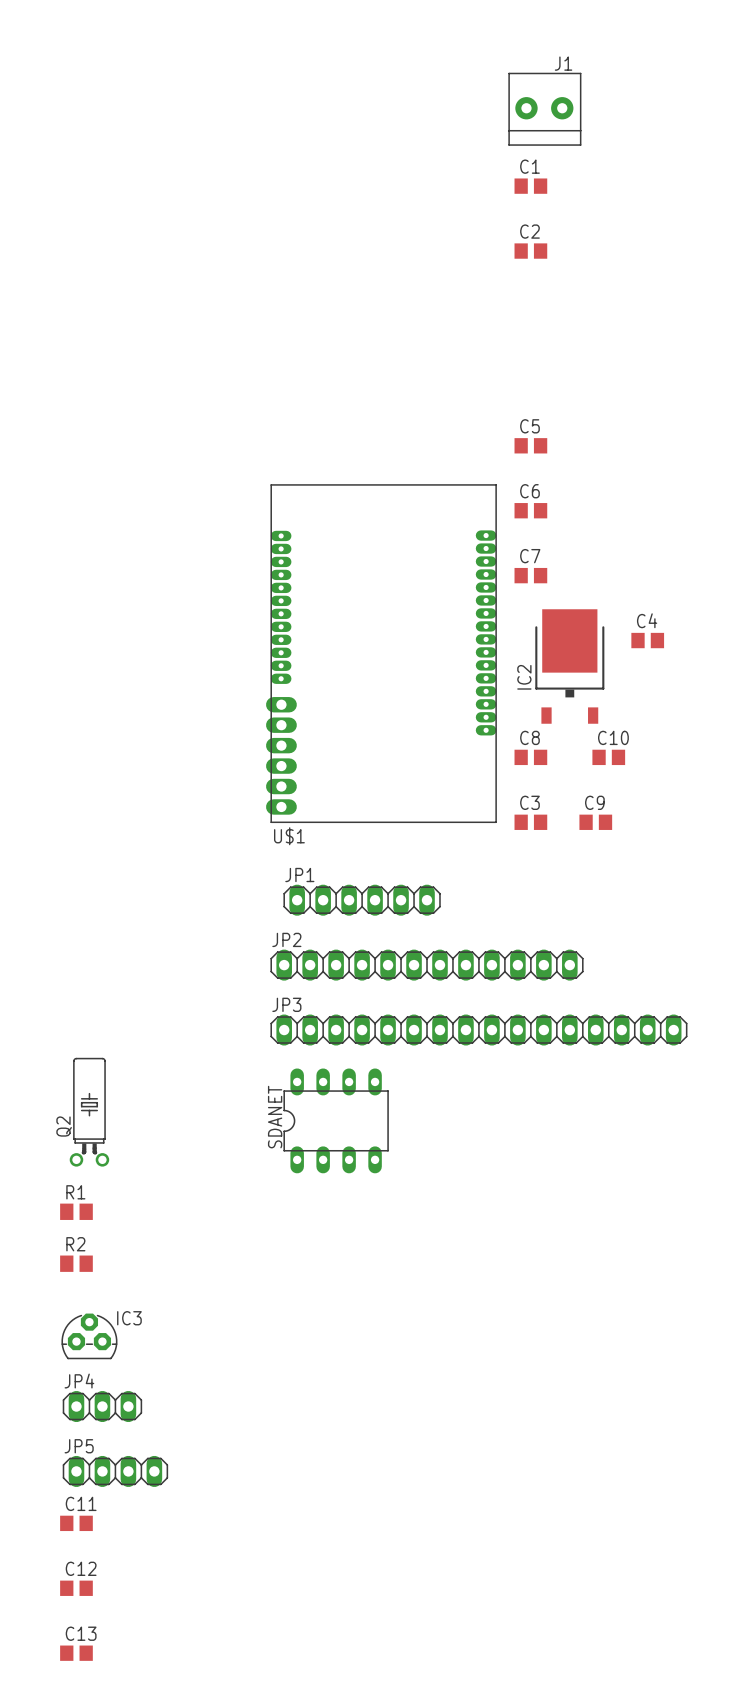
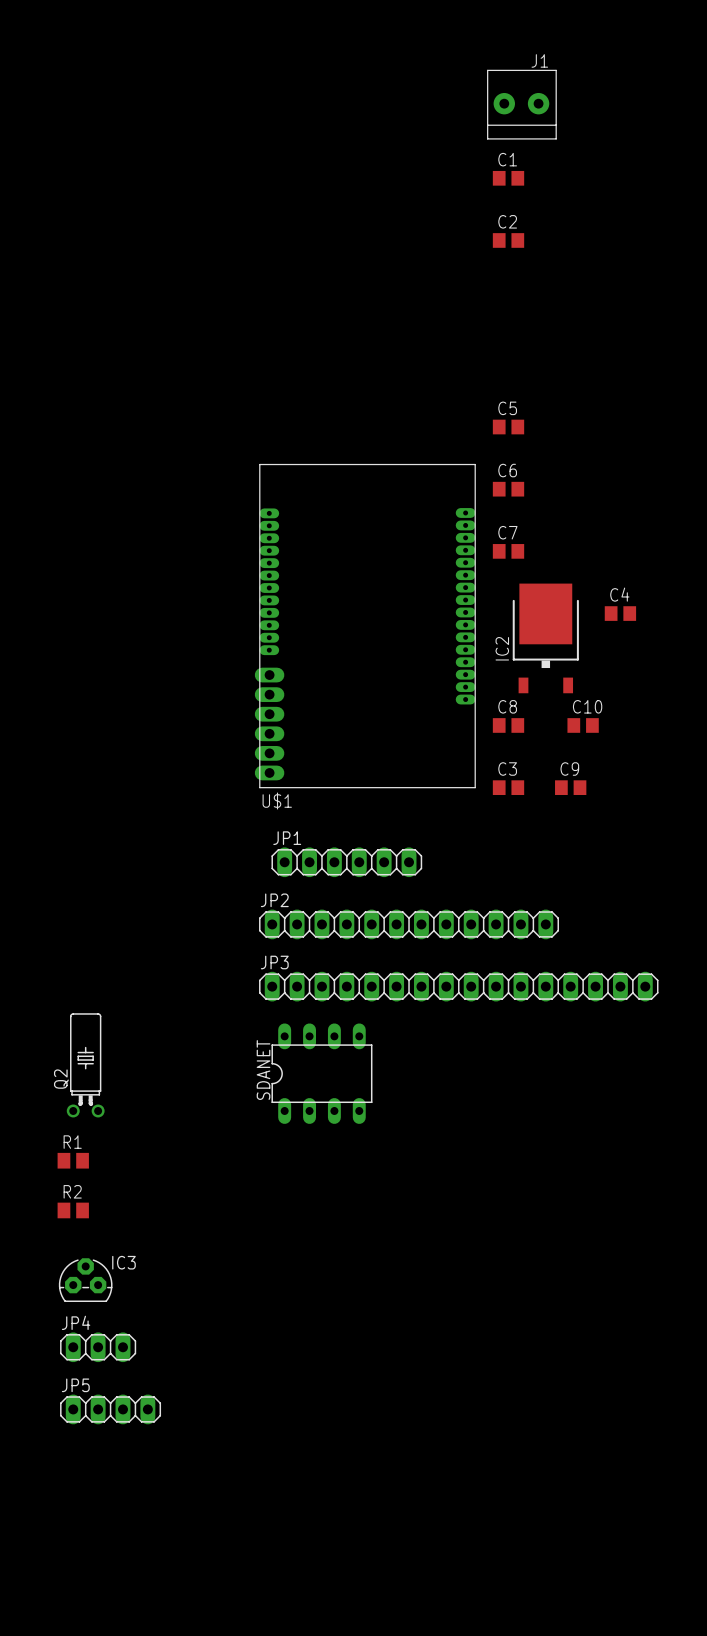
C11: (76, 1523) -> none
C12: (76, 1588) -> none
C13: (76, 1653) -> none

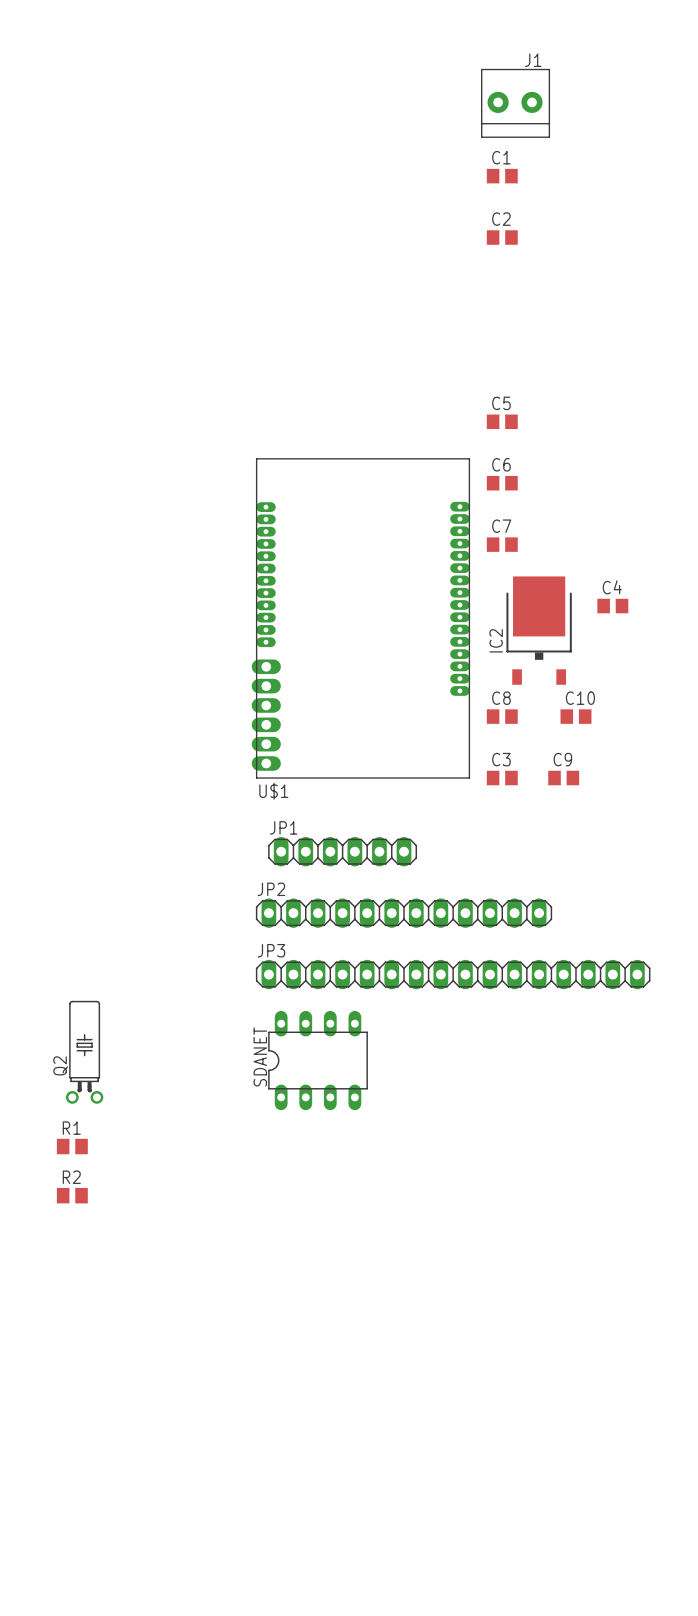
IC3: (85, 1280) -> none
JP4: (98, 1347) -> none
JP5: (110, 1409) -> none

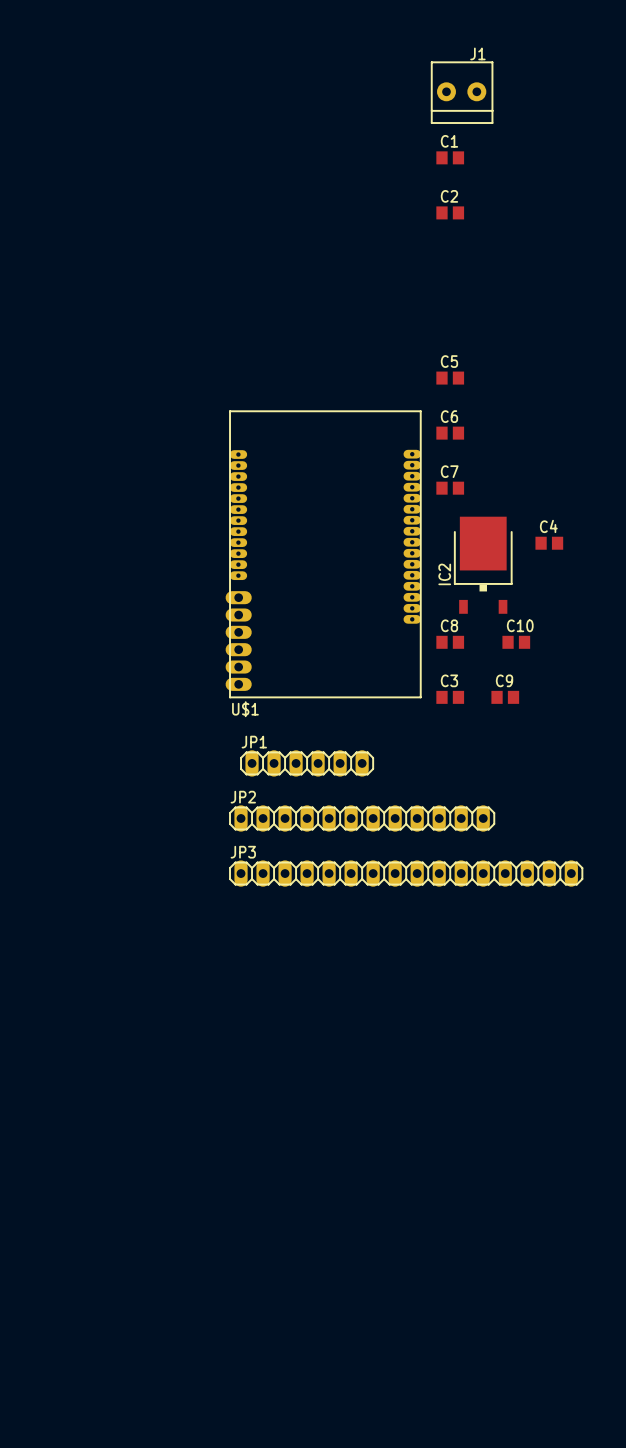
Q2: (84, 1052) -> none
SDANET: (318, 1060) -> none
R1: (72, 1146) -> none
R2: (72, 1195) -> none

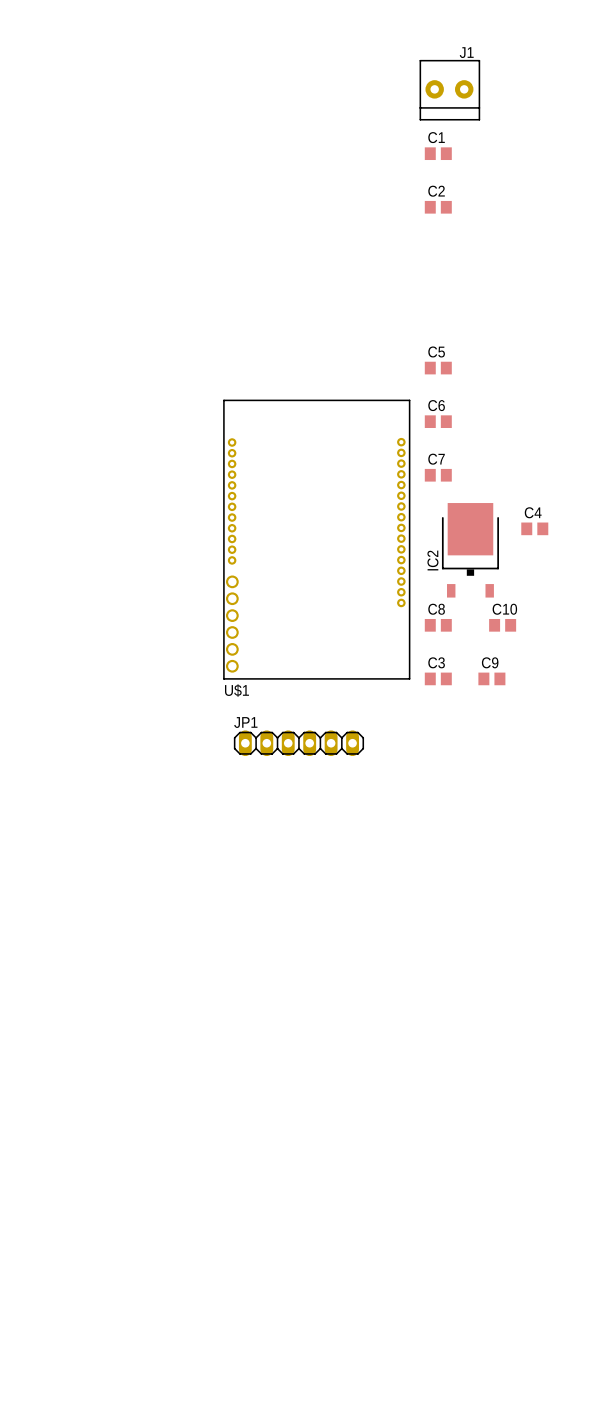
U$1 footprint: [225, 410, 422, 698] -> [223, 399, 411, 680]
JP2: (362, 818) -> none
JP3: (406, 873) -> none

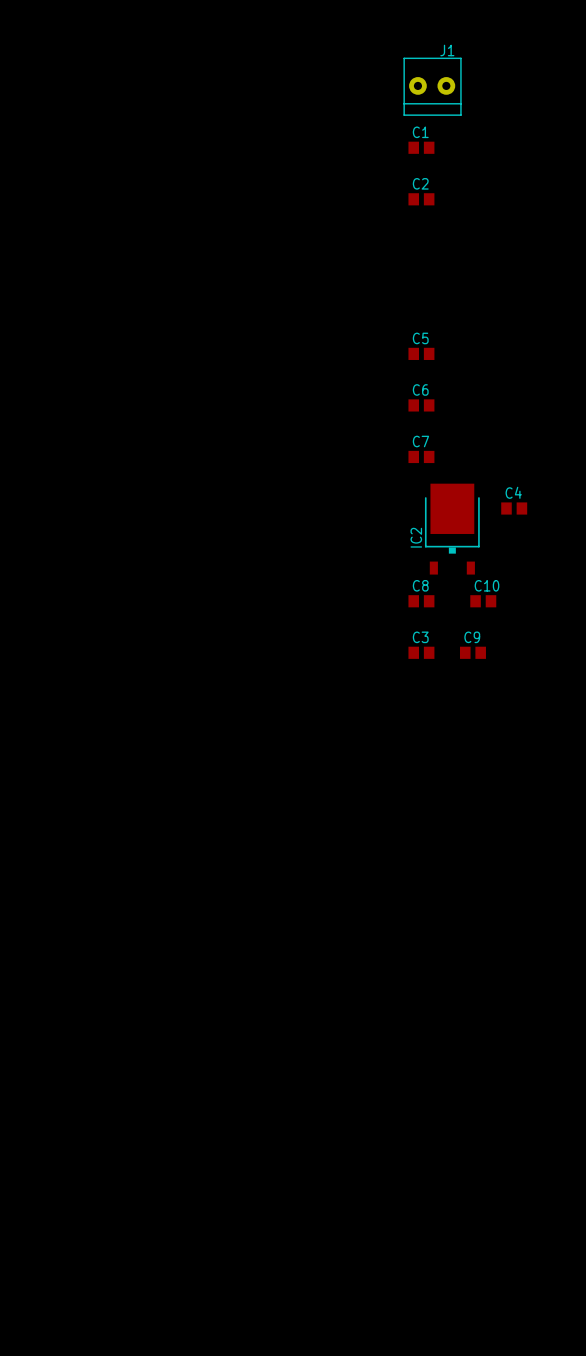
U$1: (316, 539) -> none
JP1: (298, 743) -> none

